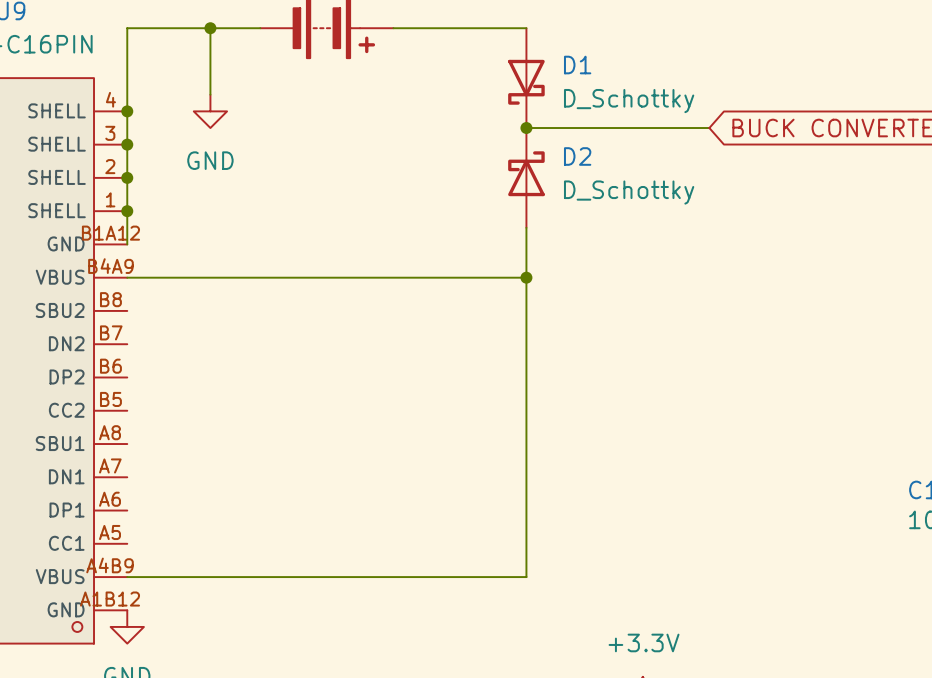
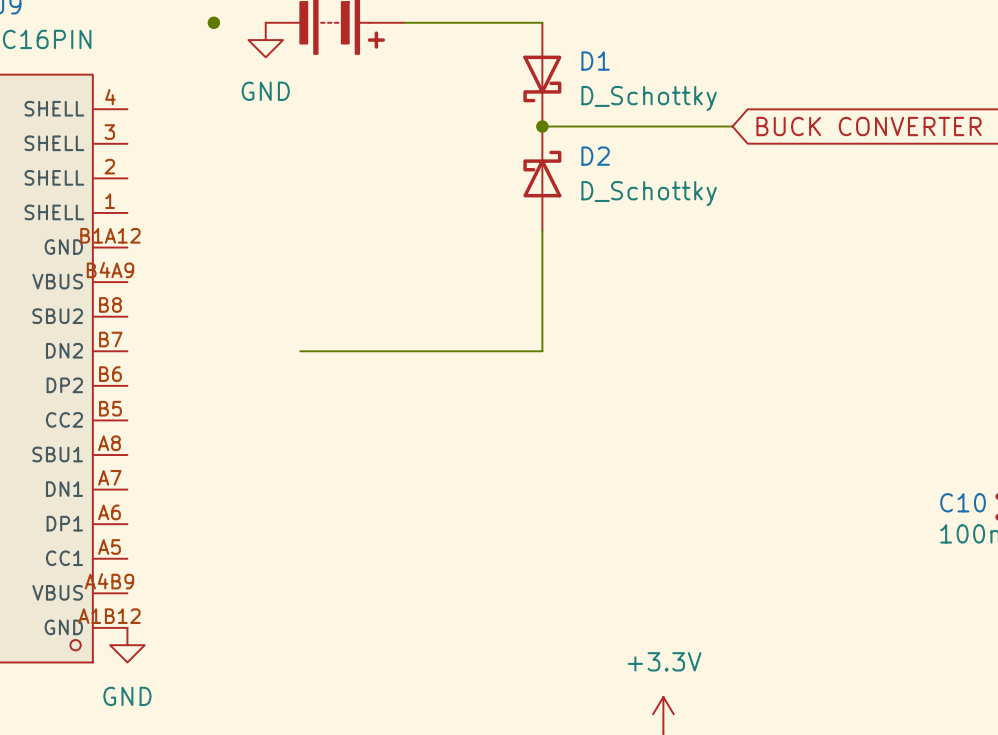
wire: (210, 28) (210, 94) -> none
wire: (260, 28) (127, 28) (127, 244) -> none
junction: (127, 111) -> none
power symbol position: GND (210, 111) -> GND (265, 40)
junction: (127, 144) -> none
junction: (127, 177) -> none
junction: (127, 211) -> none
wire: (127, 277) (526, 277) -> none
junction: (526, 277) -> none
wire: (526, 344) (526, 577) (127, 577) -> (542, 351) (300, 351)

